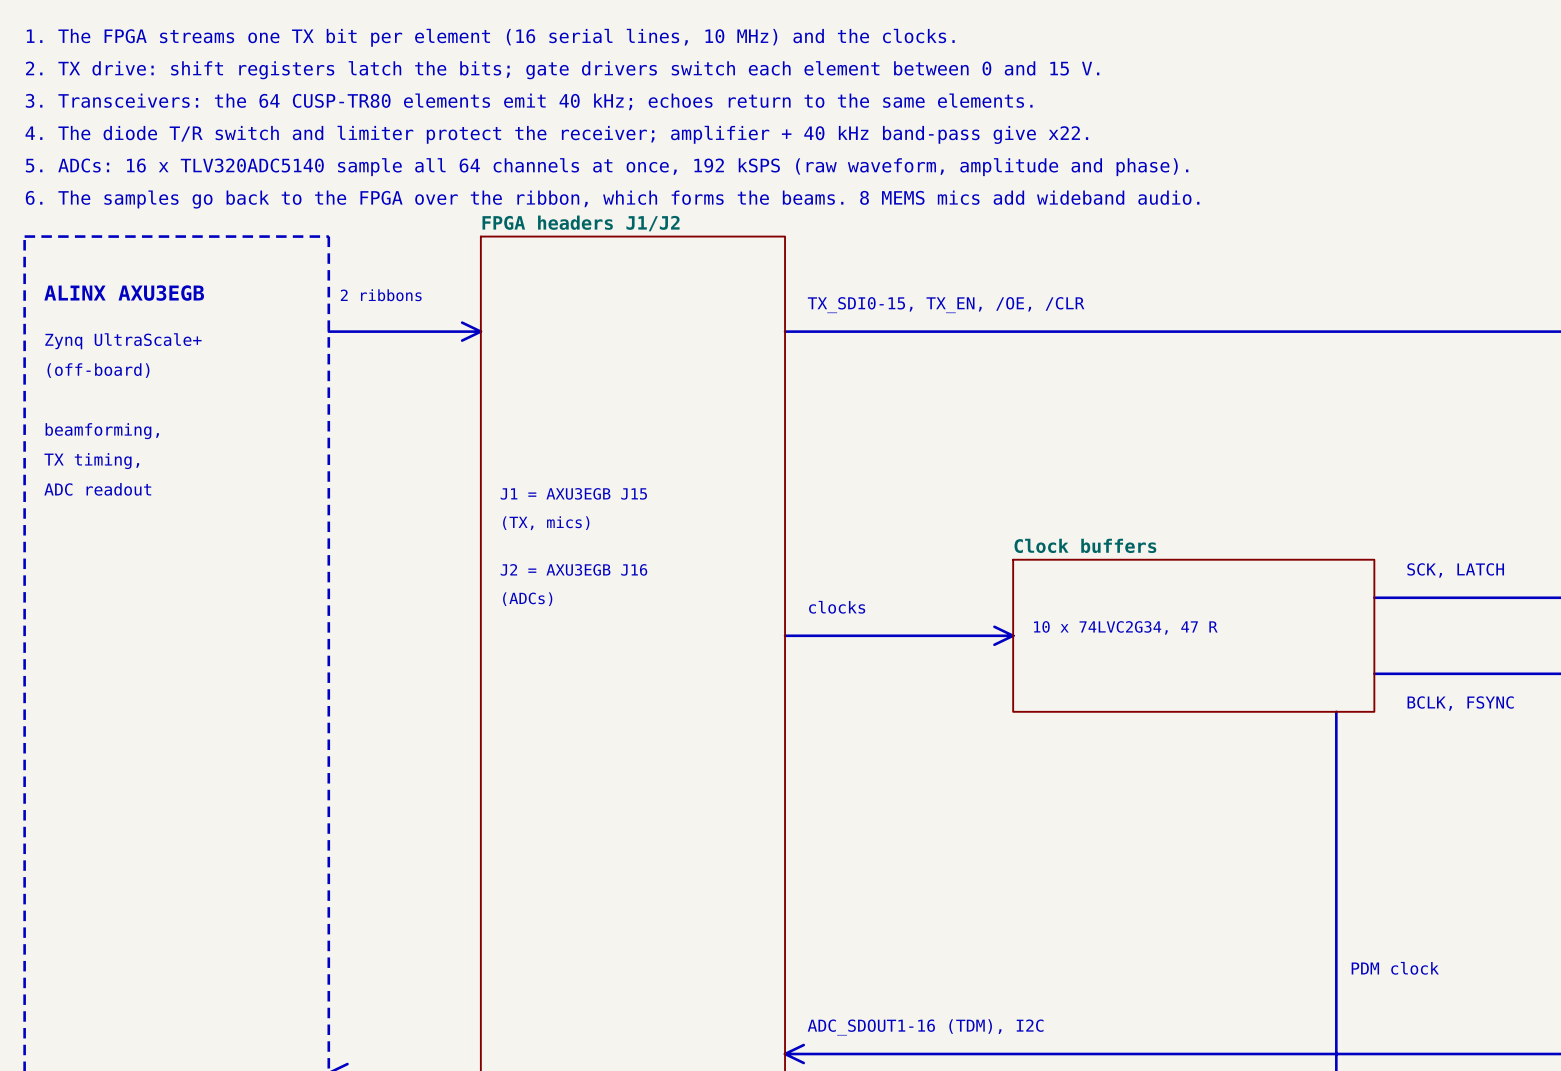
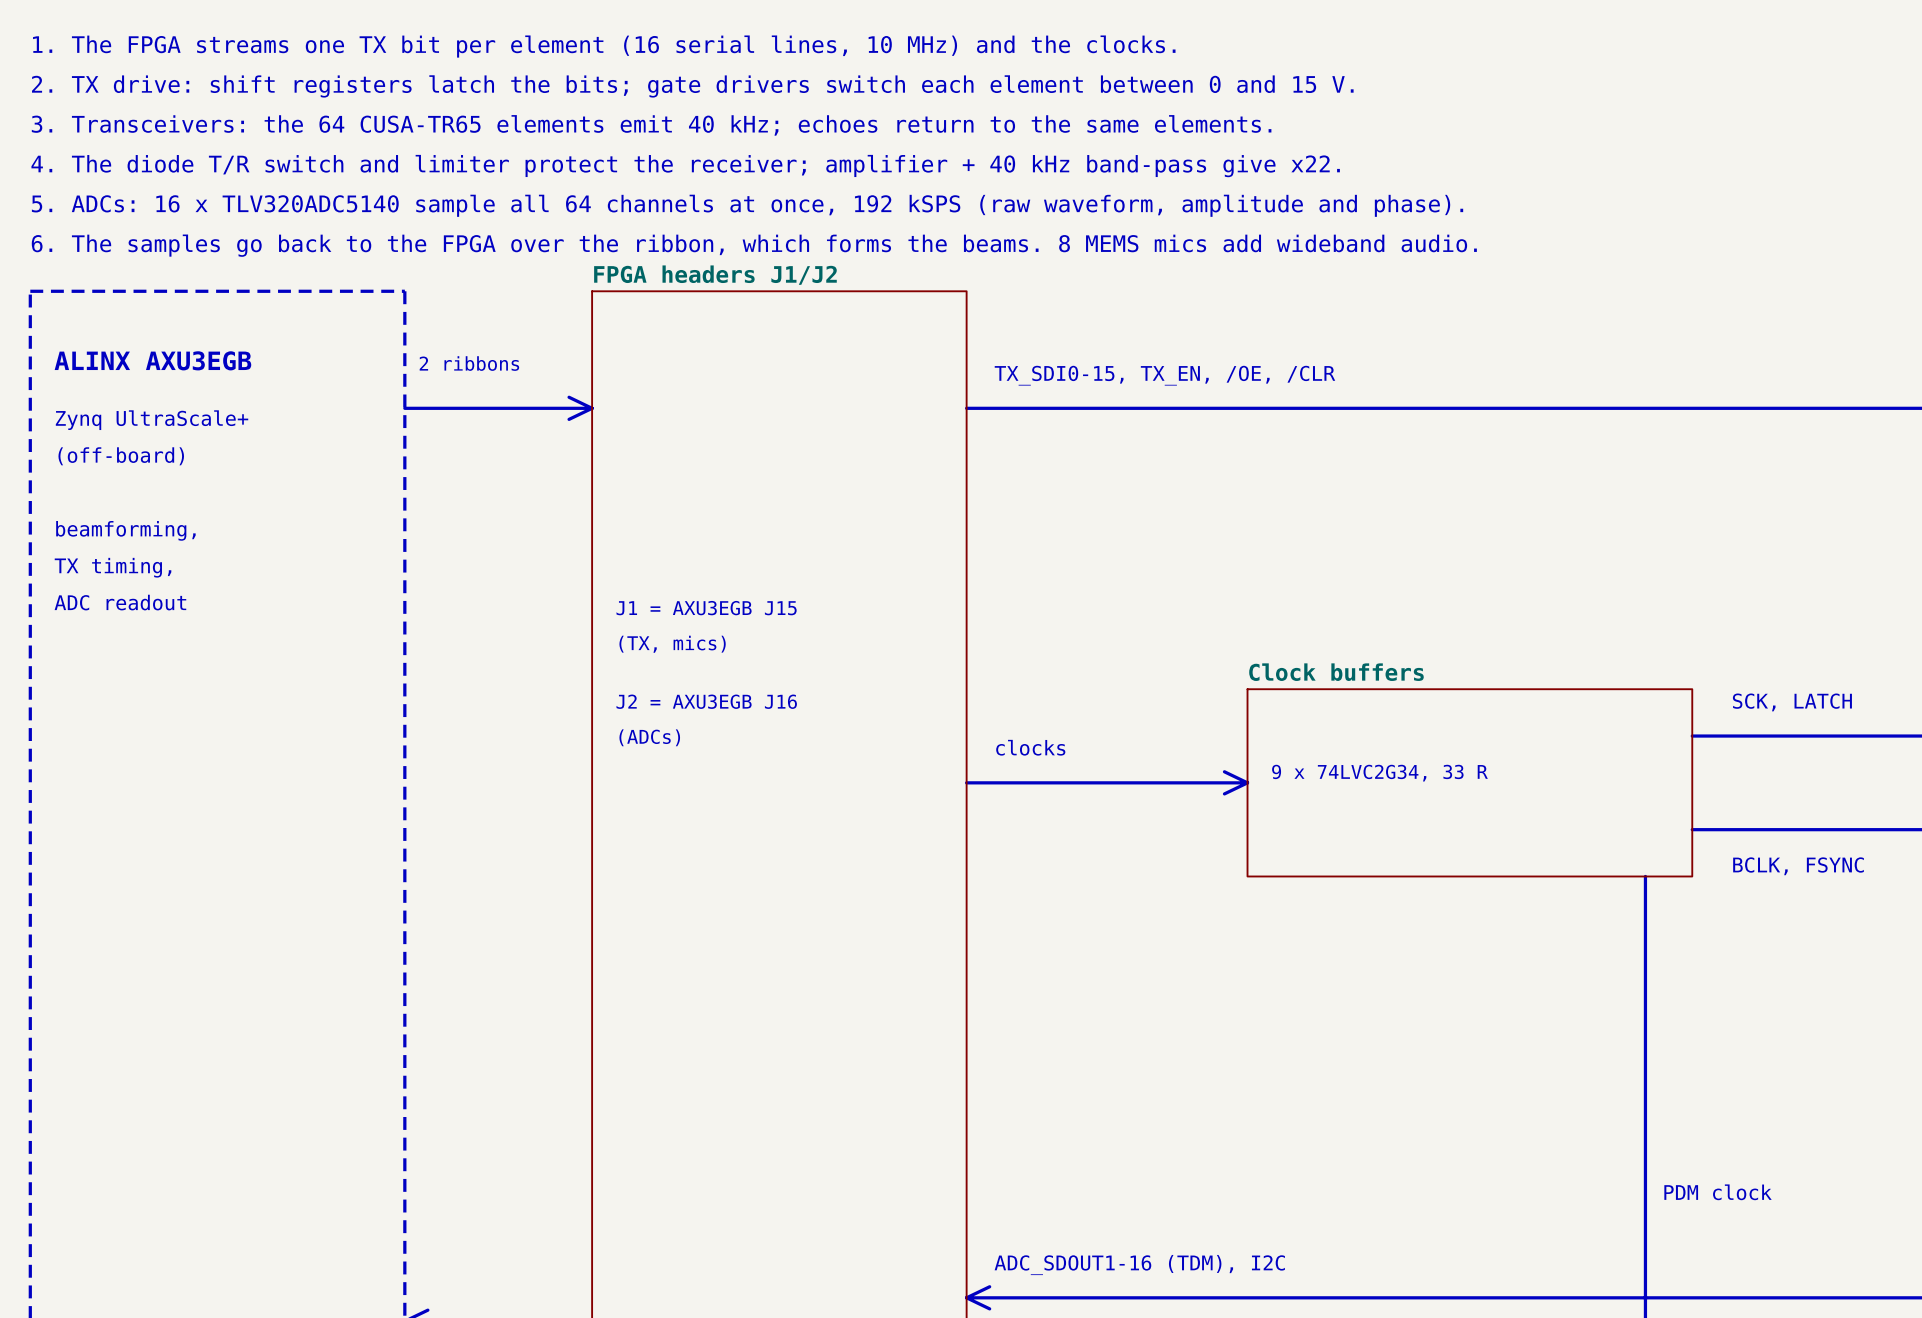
text: 3. Transceivers: the 64 CUSP-TR80 elements emit 40 kHz; echoes return to the same elements. (529, 101) -> 3. Transceivers: the 64 CUSA-TR65 elements emit 40 kHz; echoes return to the same elements. (651, 125)
text: 10 x 74LVC2G34, 47 R (1125, 627) -> 9 x 74LVC2G34, 33 R (1379, 773)

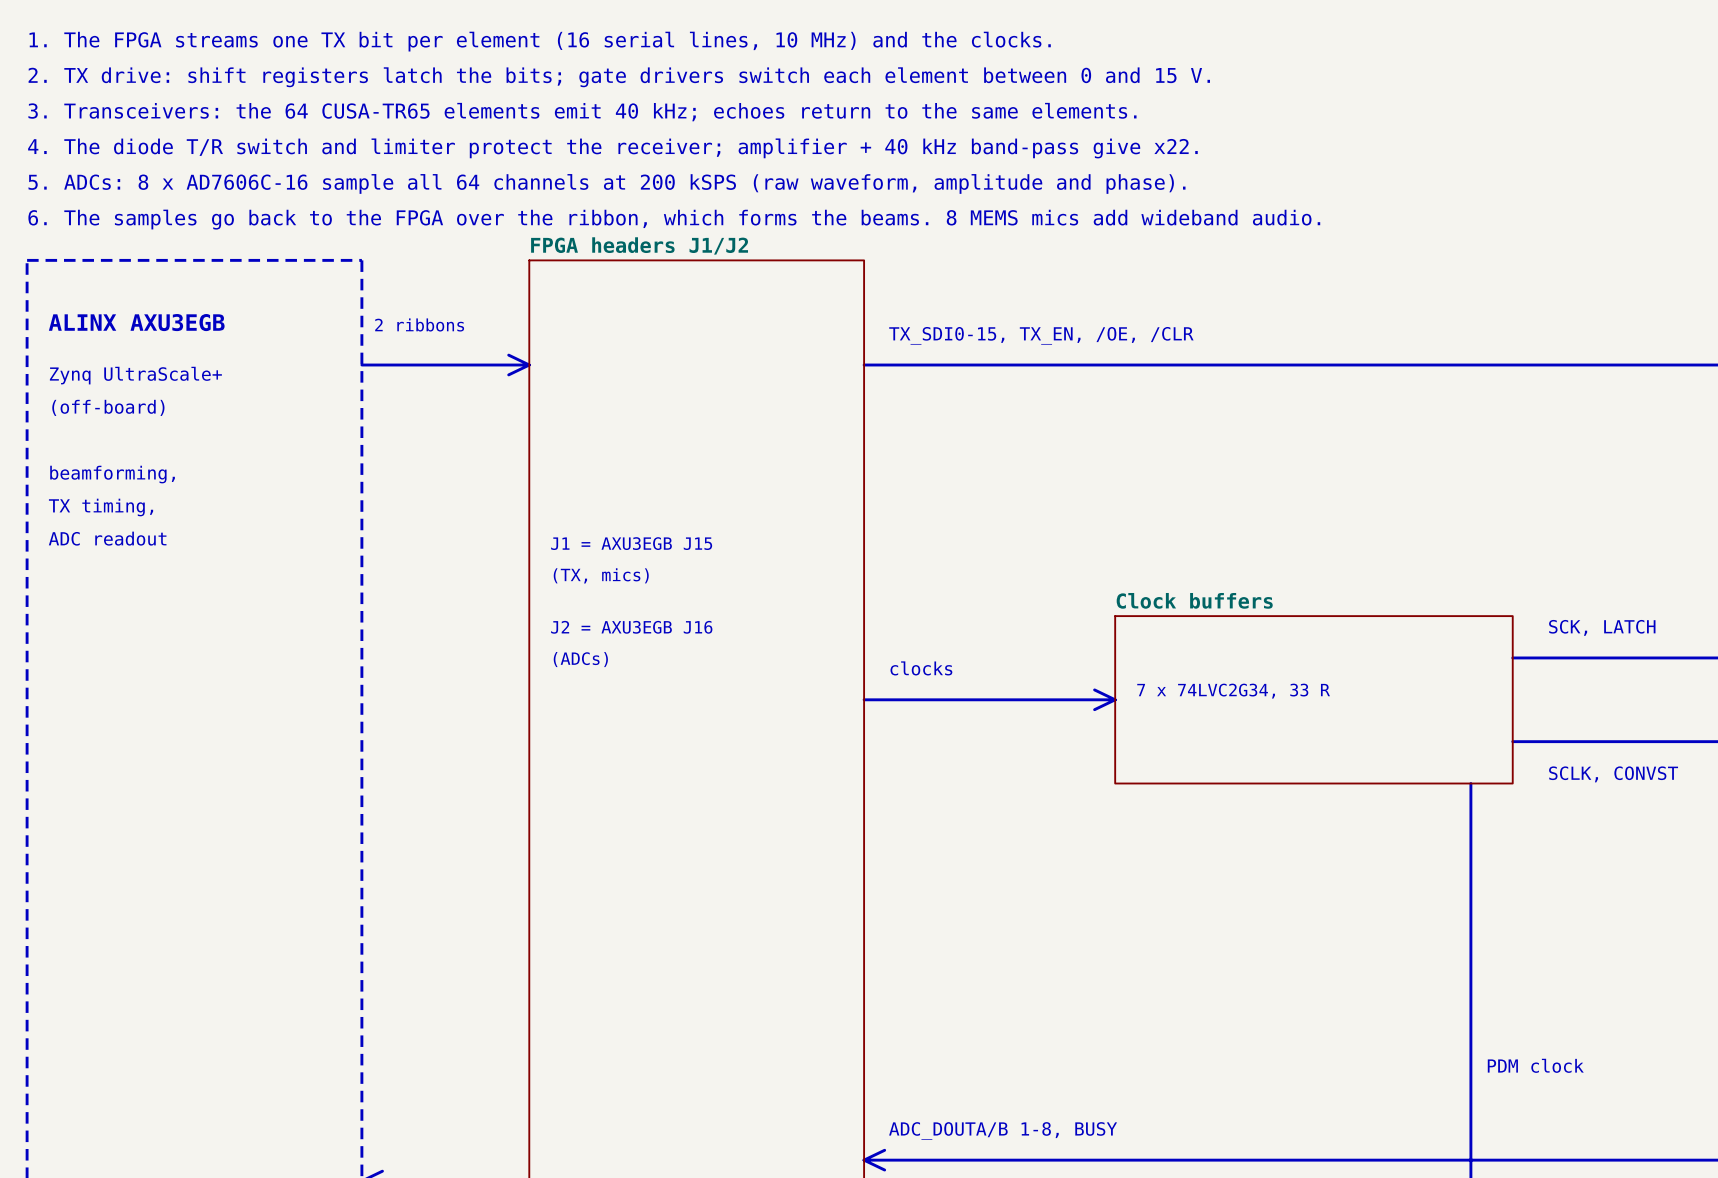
text: 5. ADCs: 16 x TLV320ADC5140 sample all 64 channels at once, 192 kSPS (raw waveform, amplitude and phase). (747, 205) -> 5. ADCs: 8 x AD7606C-16 sample all 64 channels at 200 kSPS (raw waveform, amplitude and phase). (607, 183)
text: 9 x 74LVC2G34, 33 R (1379, 773) -> 7 x 74LVC2G34, 33 R (1233, 691)
text: BCLK, FSYNC (1798, 866) -> SCLK, CONVST (1613, 774)
text: ADC_SDOUT1-16 (TDM), I2C (1139, 1265) -> ADC_DOUTA/B 1-8, BUSY (1003, 1130)

